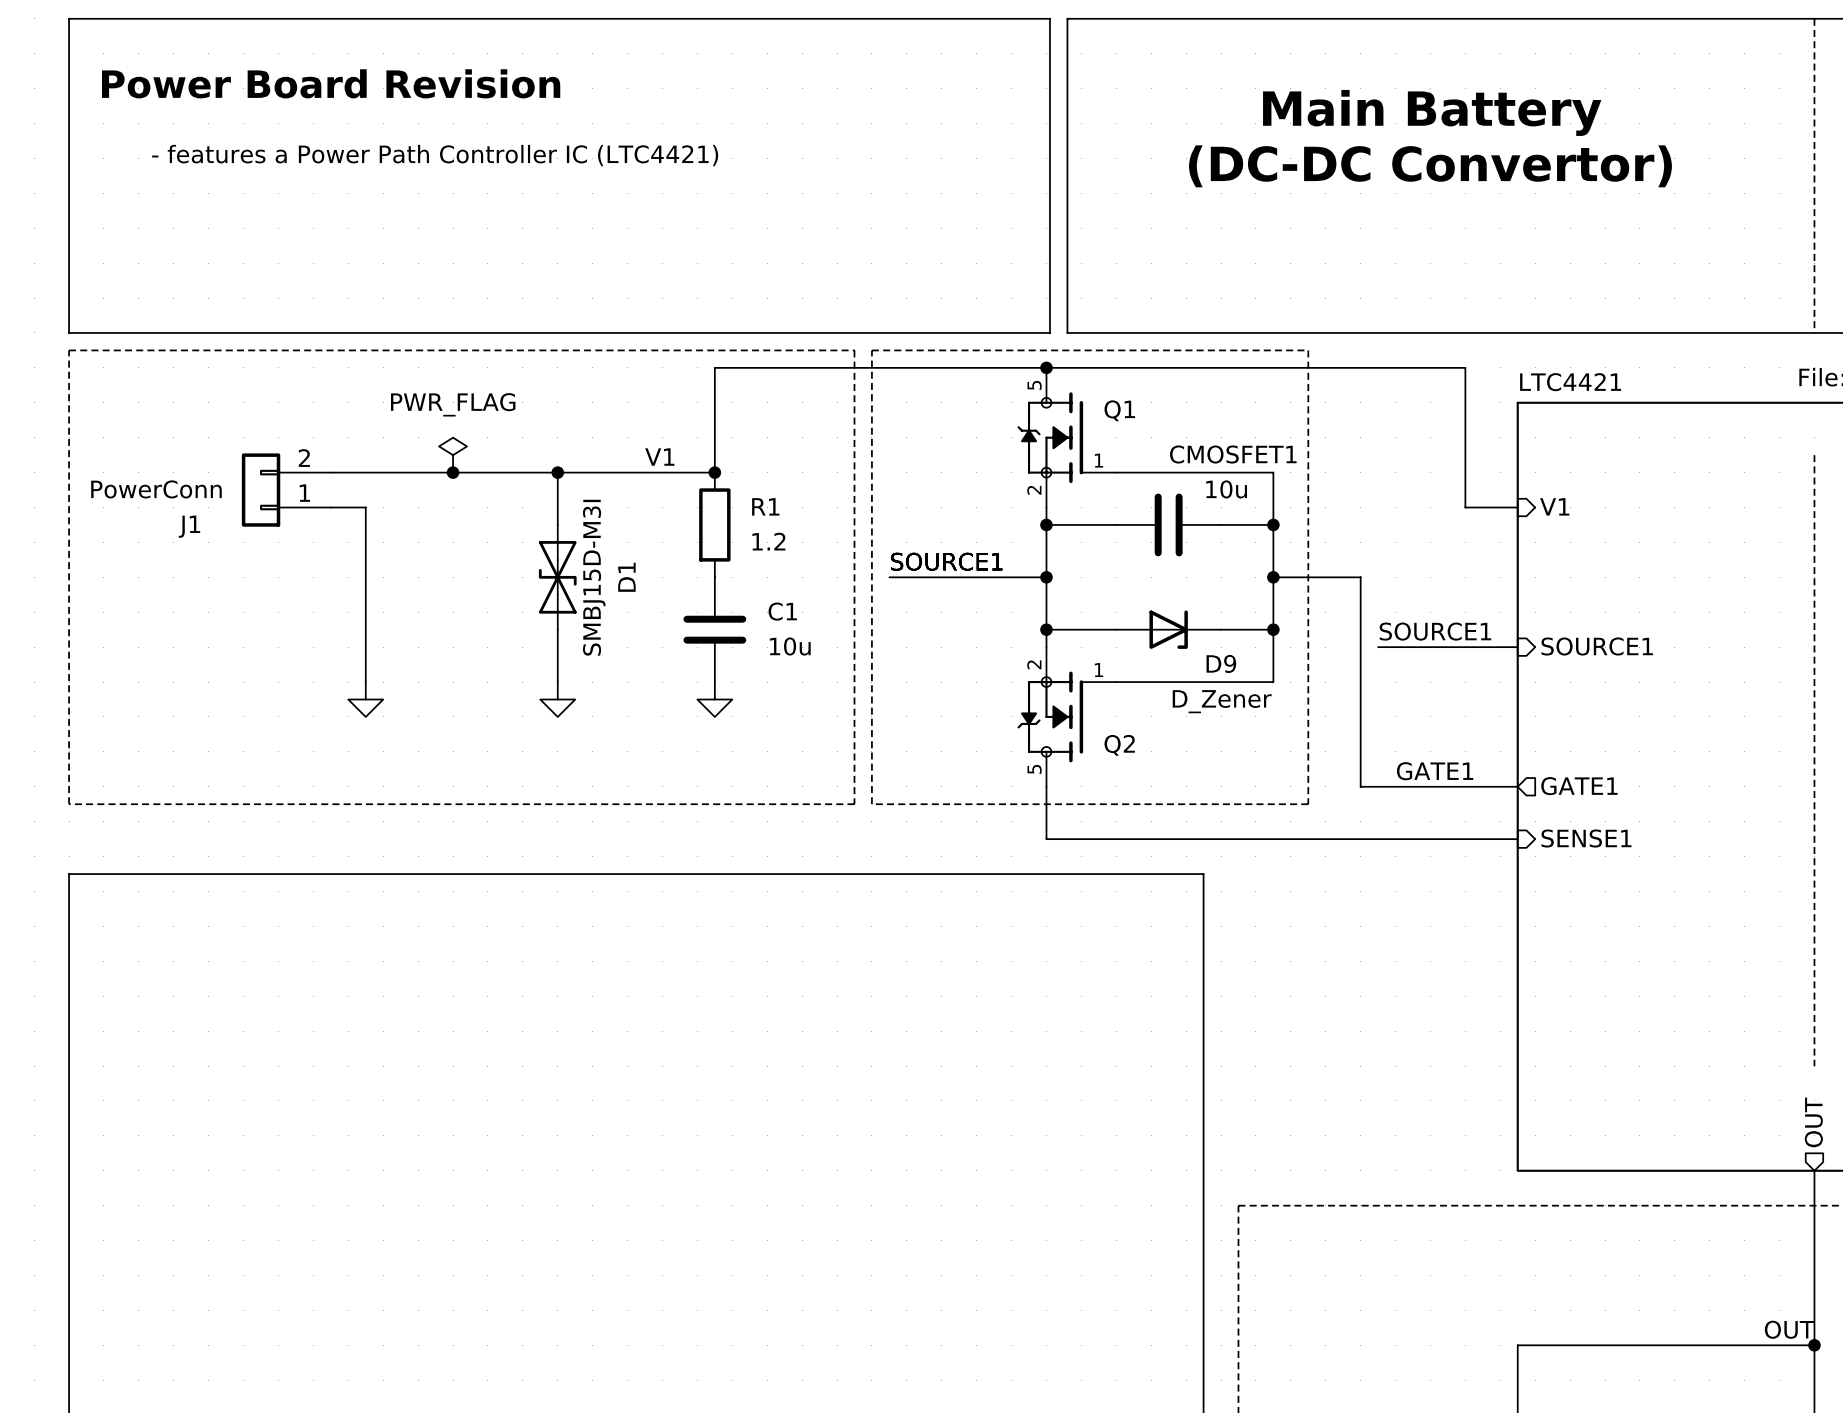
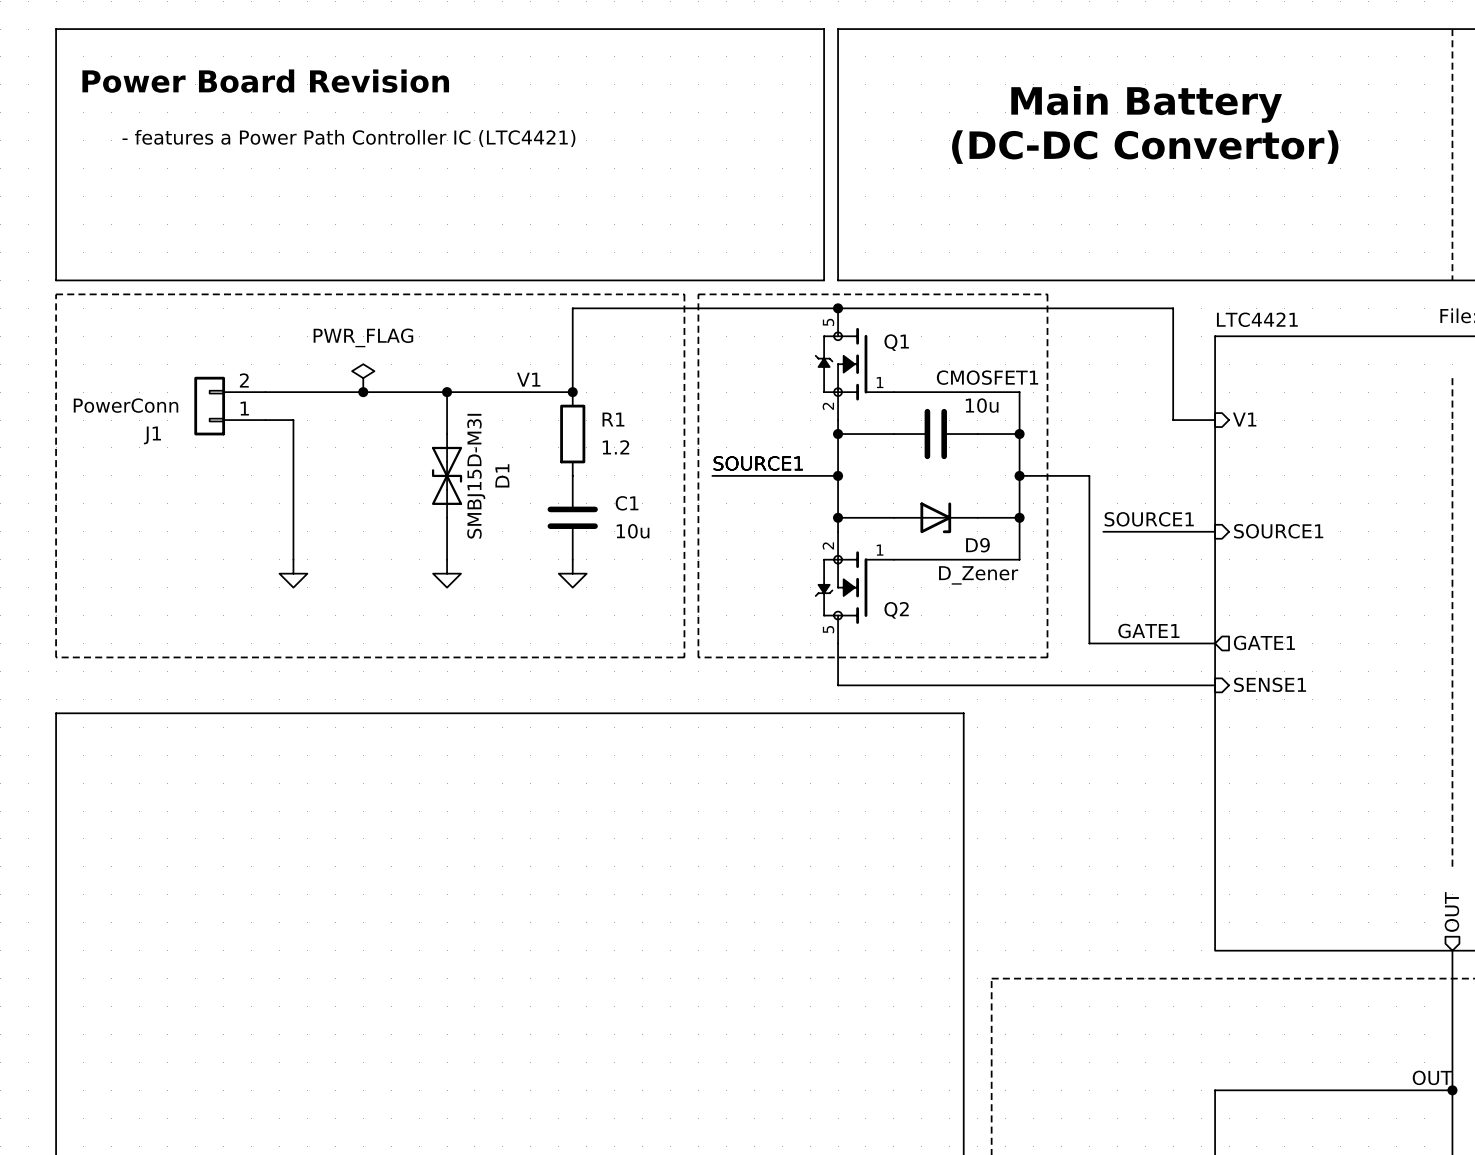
line: (1029, 18) (1046, 18) -> (824, 29) (824, 280)
line: (1049, 18) (1049, 332) -> (840, 29) (854, 29)
line: (1067, 18) (1067, 332) -> (840, 280) (854, 280)
line: (1029, 332) (1046, 332) -> (838, 29) (838, 280)

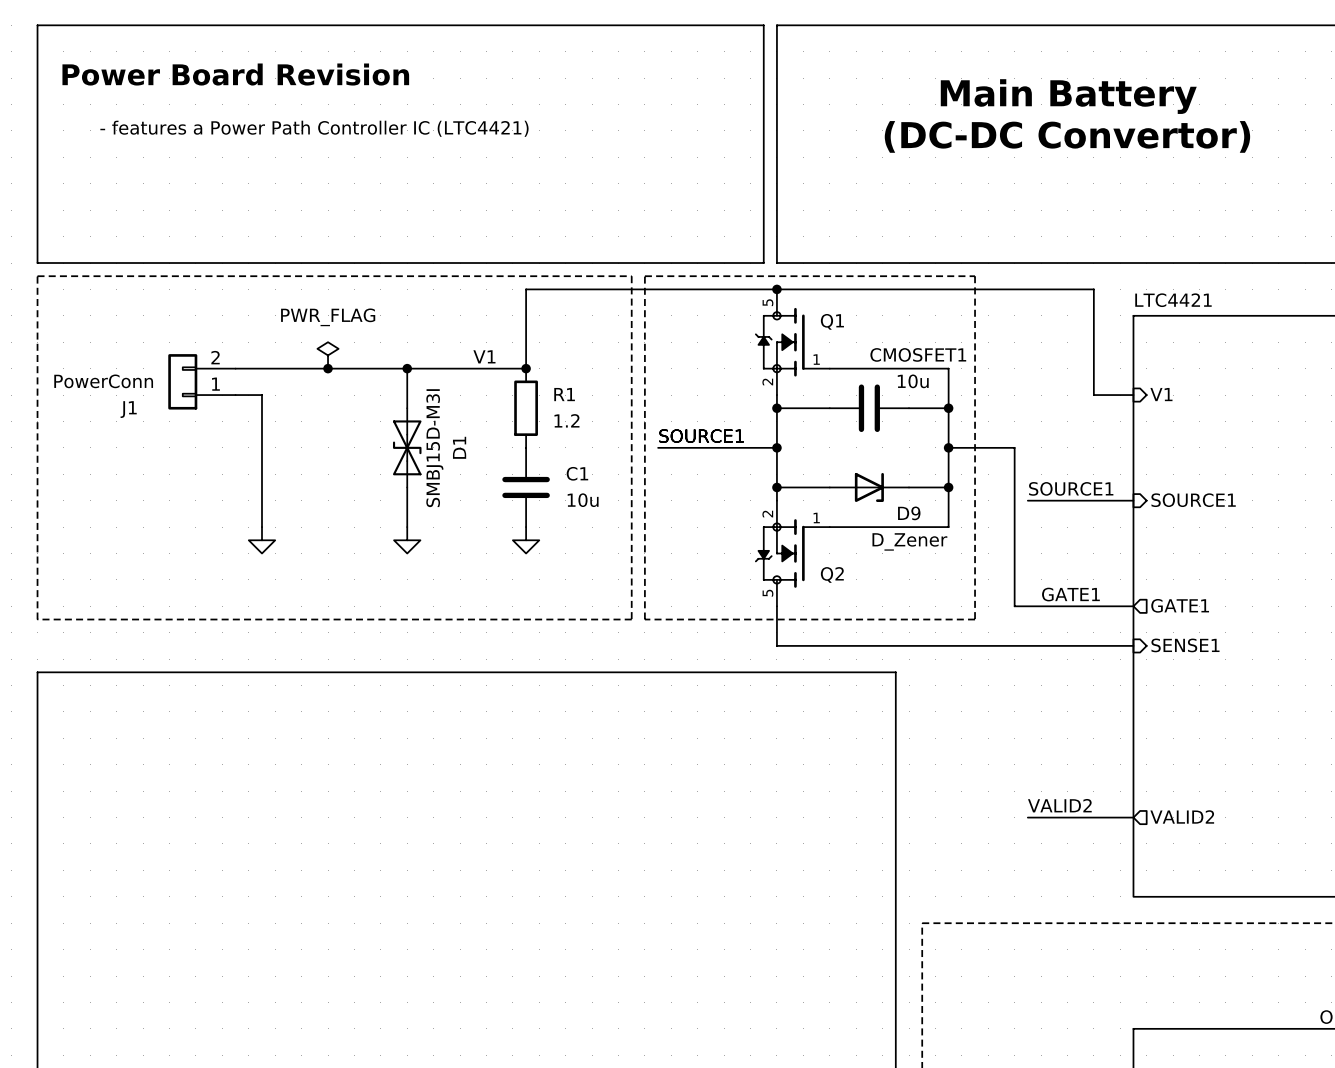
label: none -> VALID2 (1059, 805)
wire: none -> (1027, 817) (1133, 817)
sheet pin: none -> VALID2 (1182, 816)

